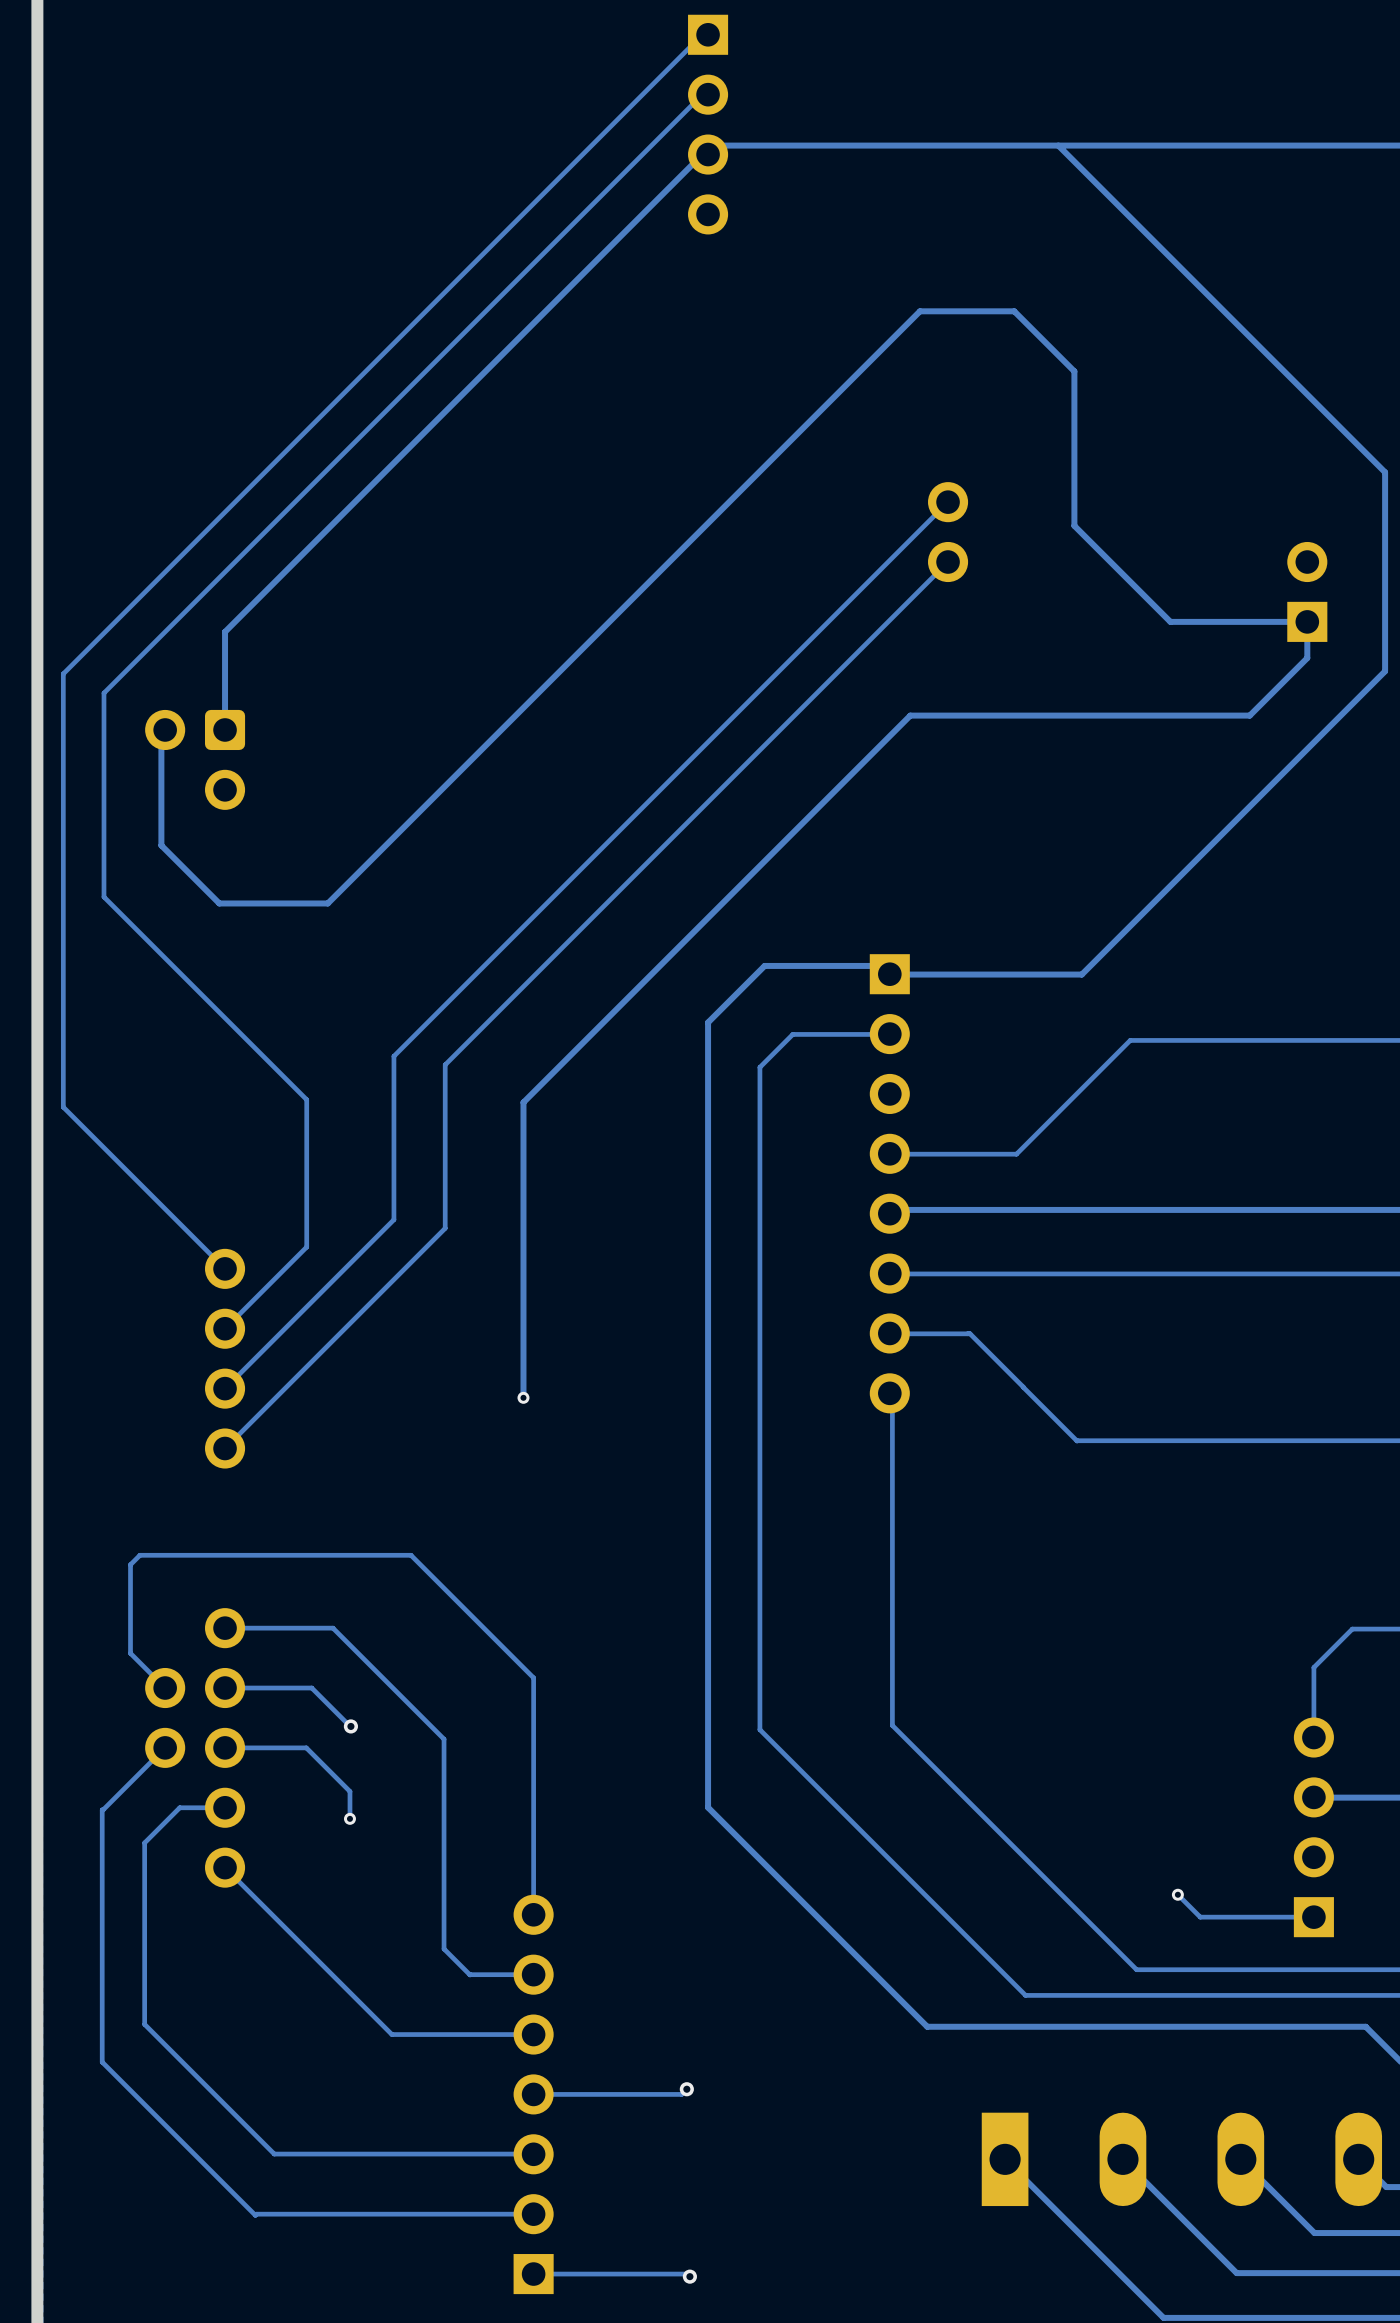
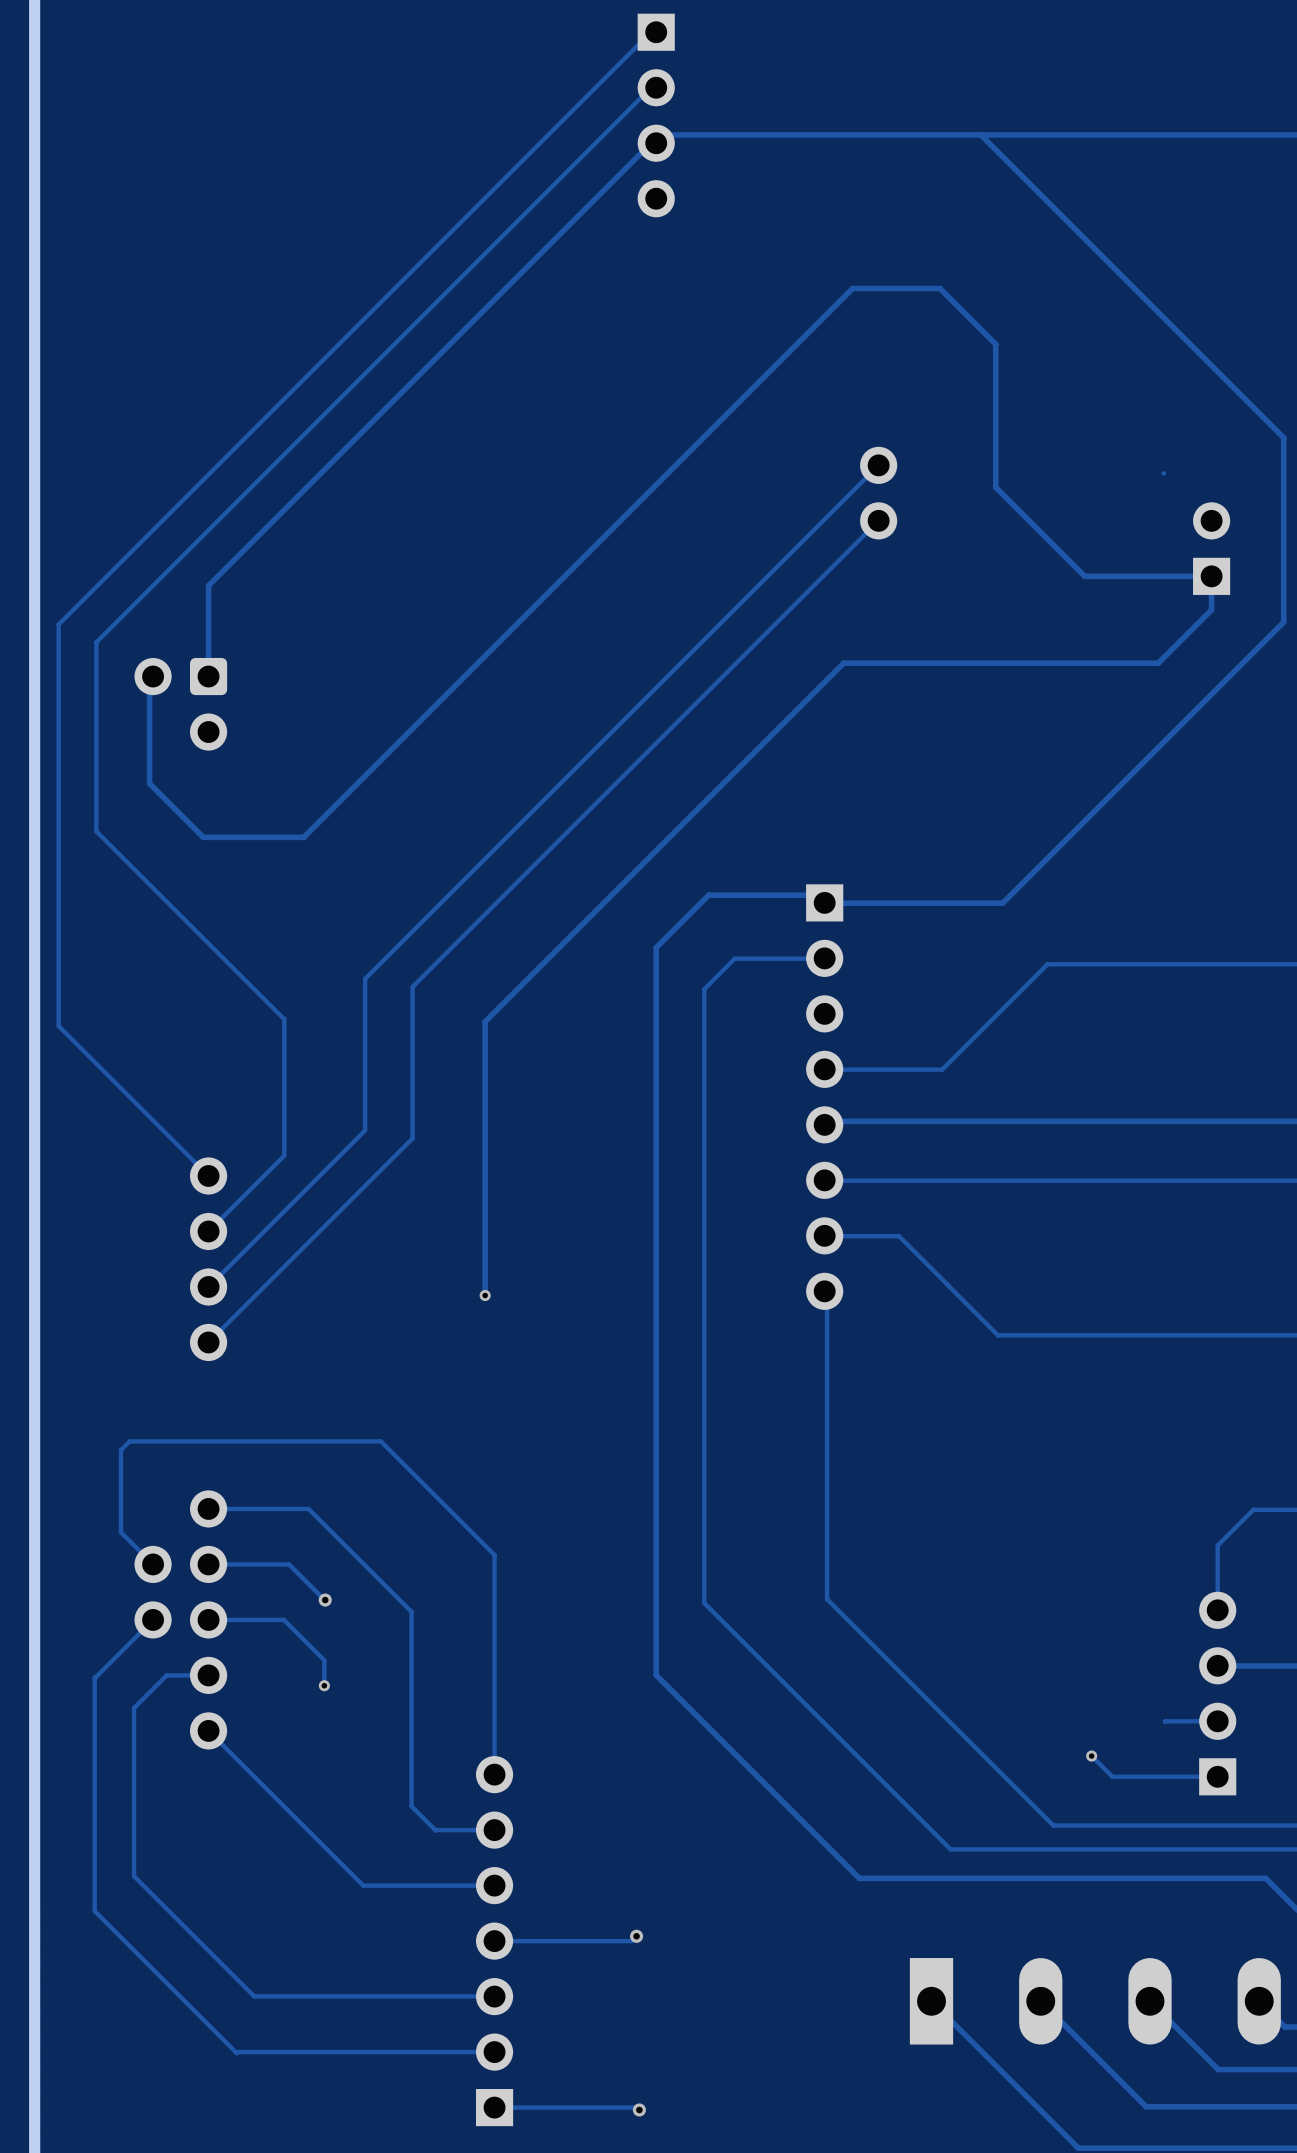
track: none -> (1164, 473) (1163, 473)
track: none -> (1217, 1721) (1164, 1721)

